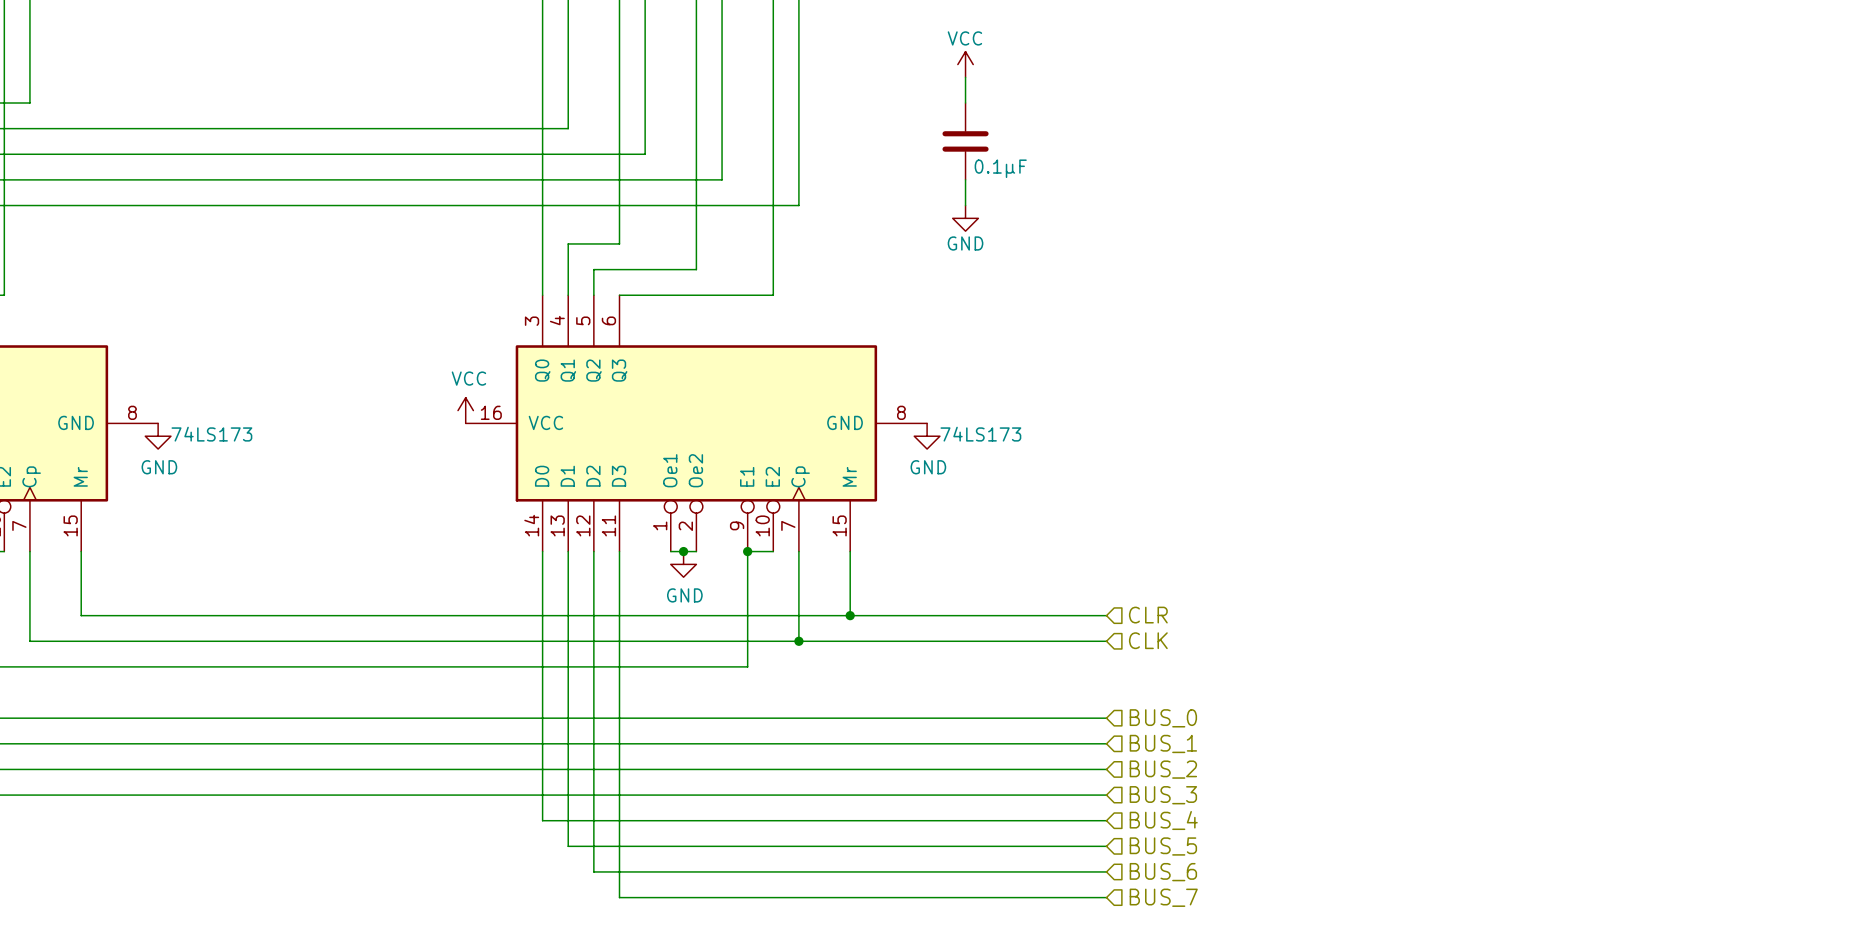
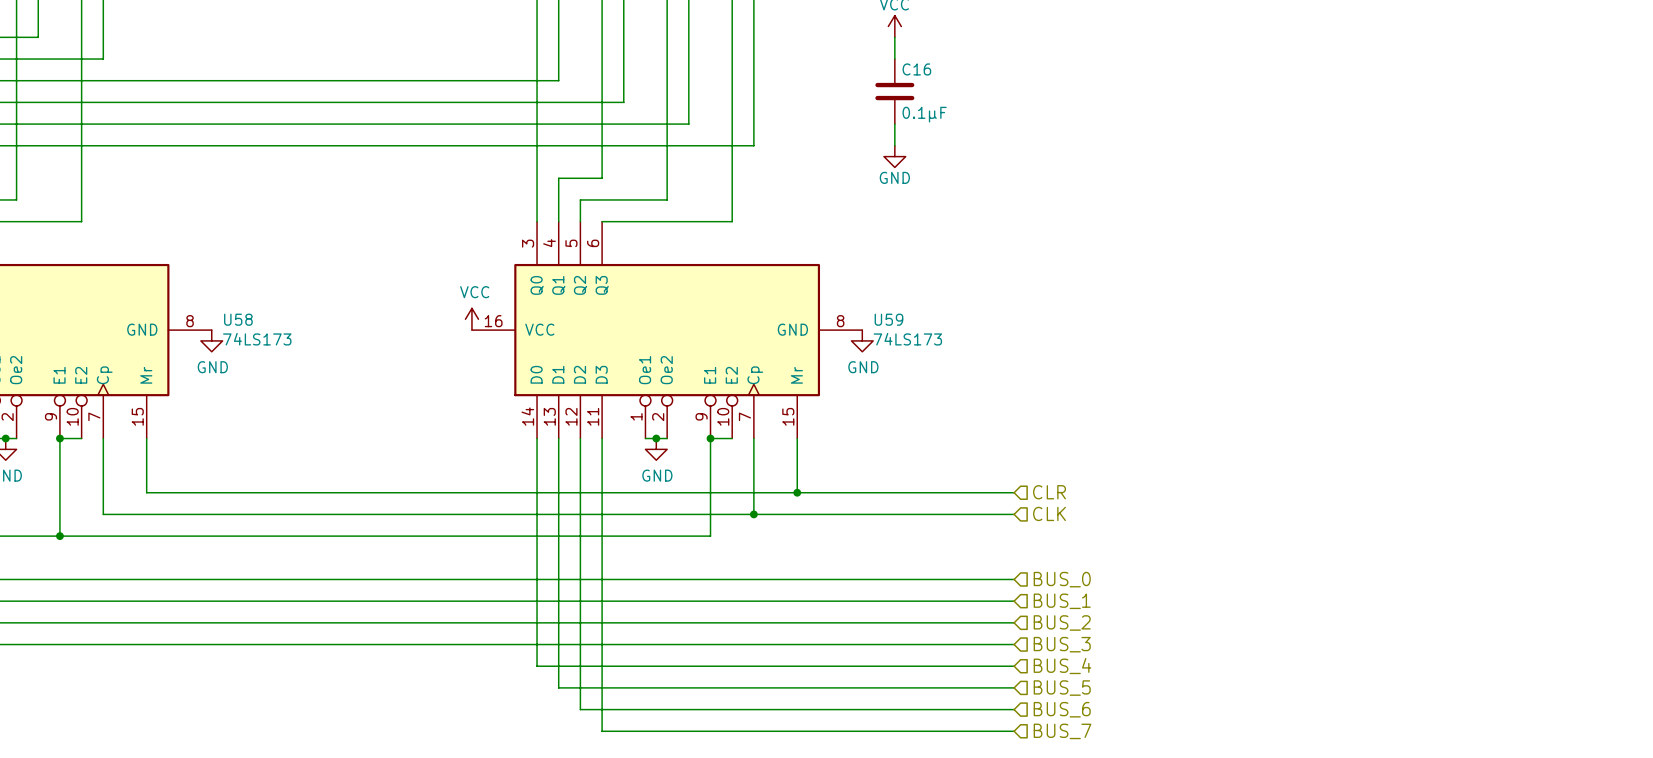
C16 name: none -> C16 (916, 69)
U58 name: none -> U58 (238, 319)
U59 name: none -> U59 (888, 319)

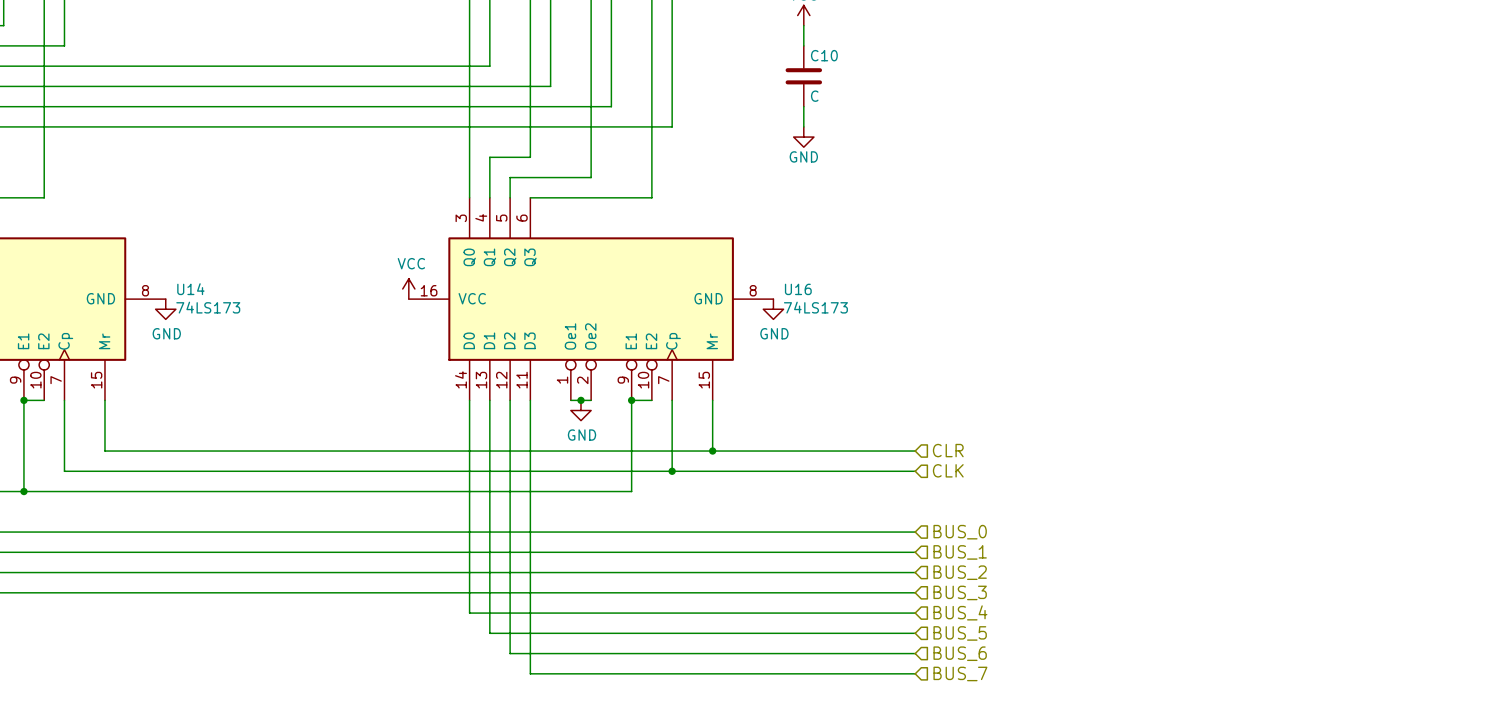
C16 name: C16 (916, 69) -> C10 (824, 55)
C16 value: 0.1µF (924, 114) -> C (814, 96)
U58 name: U58 (238, 319) -> U14 (190, 289)
U59 name: U59 (888, 319) -> U16 (798, 289)

